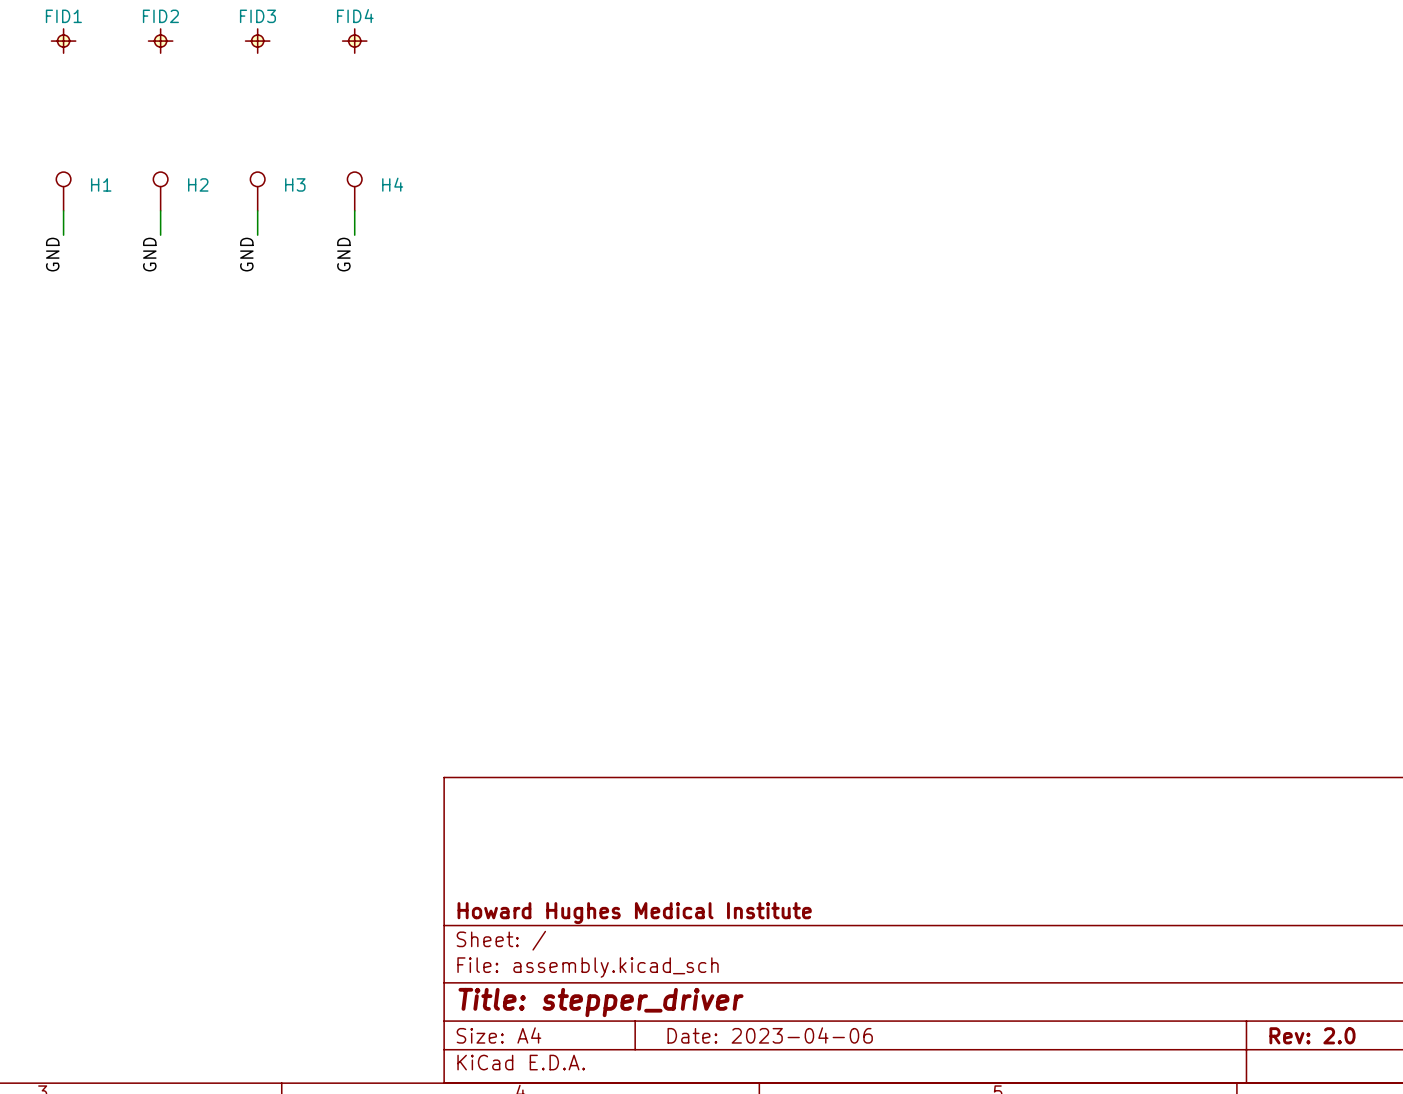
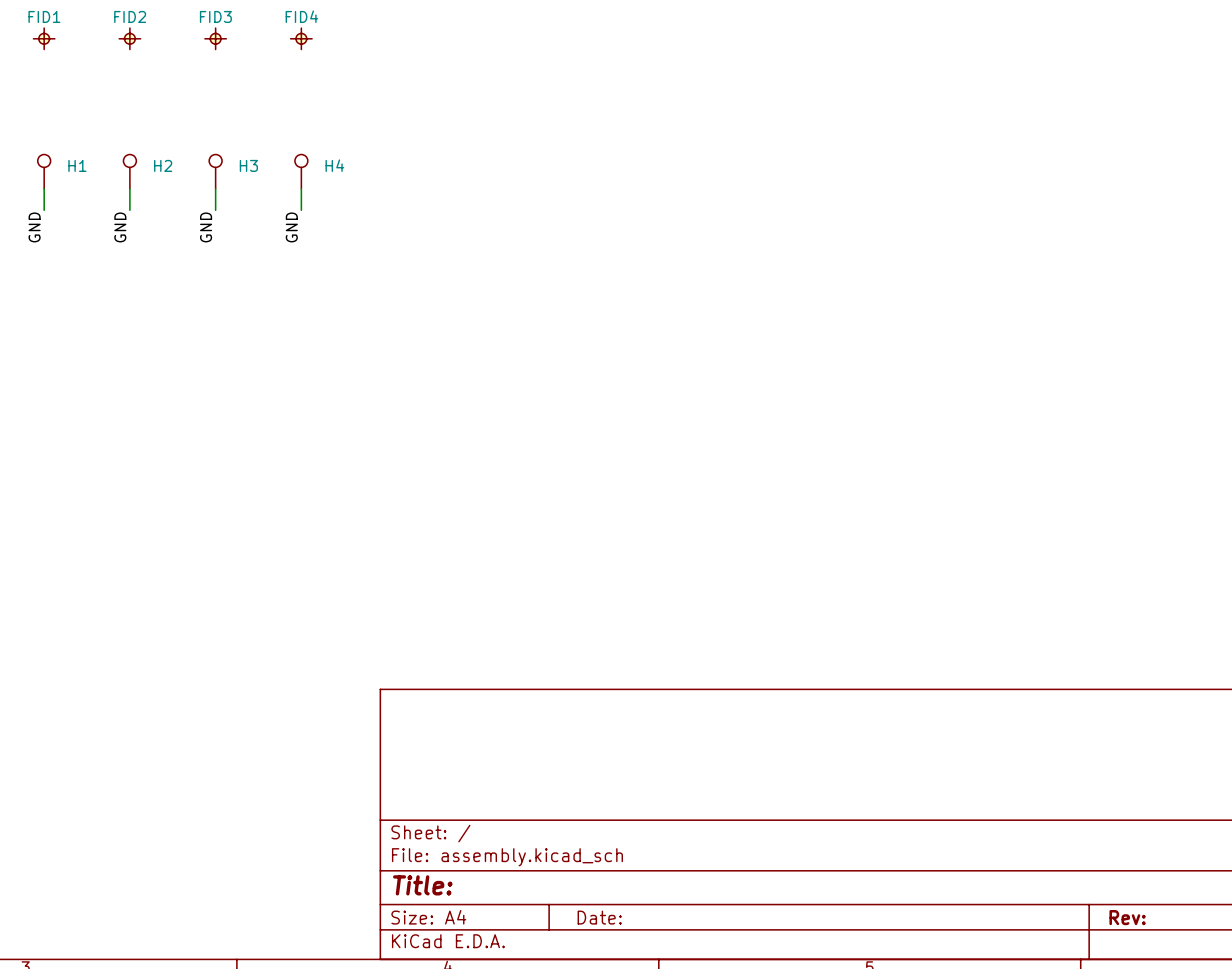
title block: Howard Hughes Medical Institute (634, 913) -> none
title block: Title: stepper_driver (601, 1002) -> Title: (422, 885)
title block: Date: 2023-04-06 (770, 1035) -> Date: (599, 917)
title block: Rev: 2.0 (1312, 1035) -> Rev: (1127, 917)

